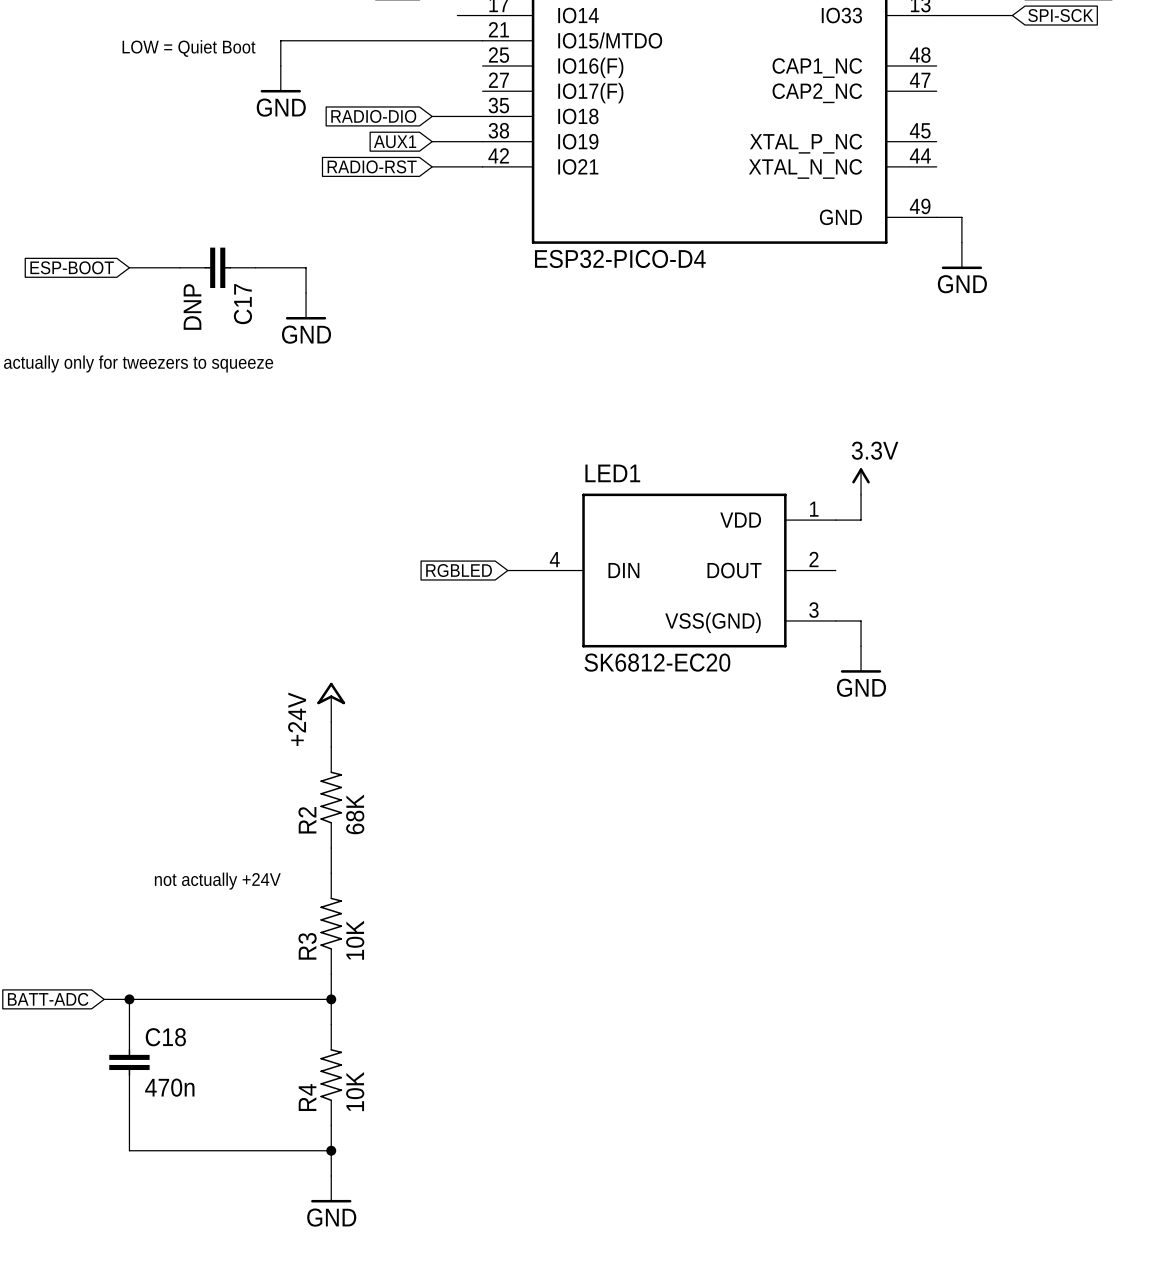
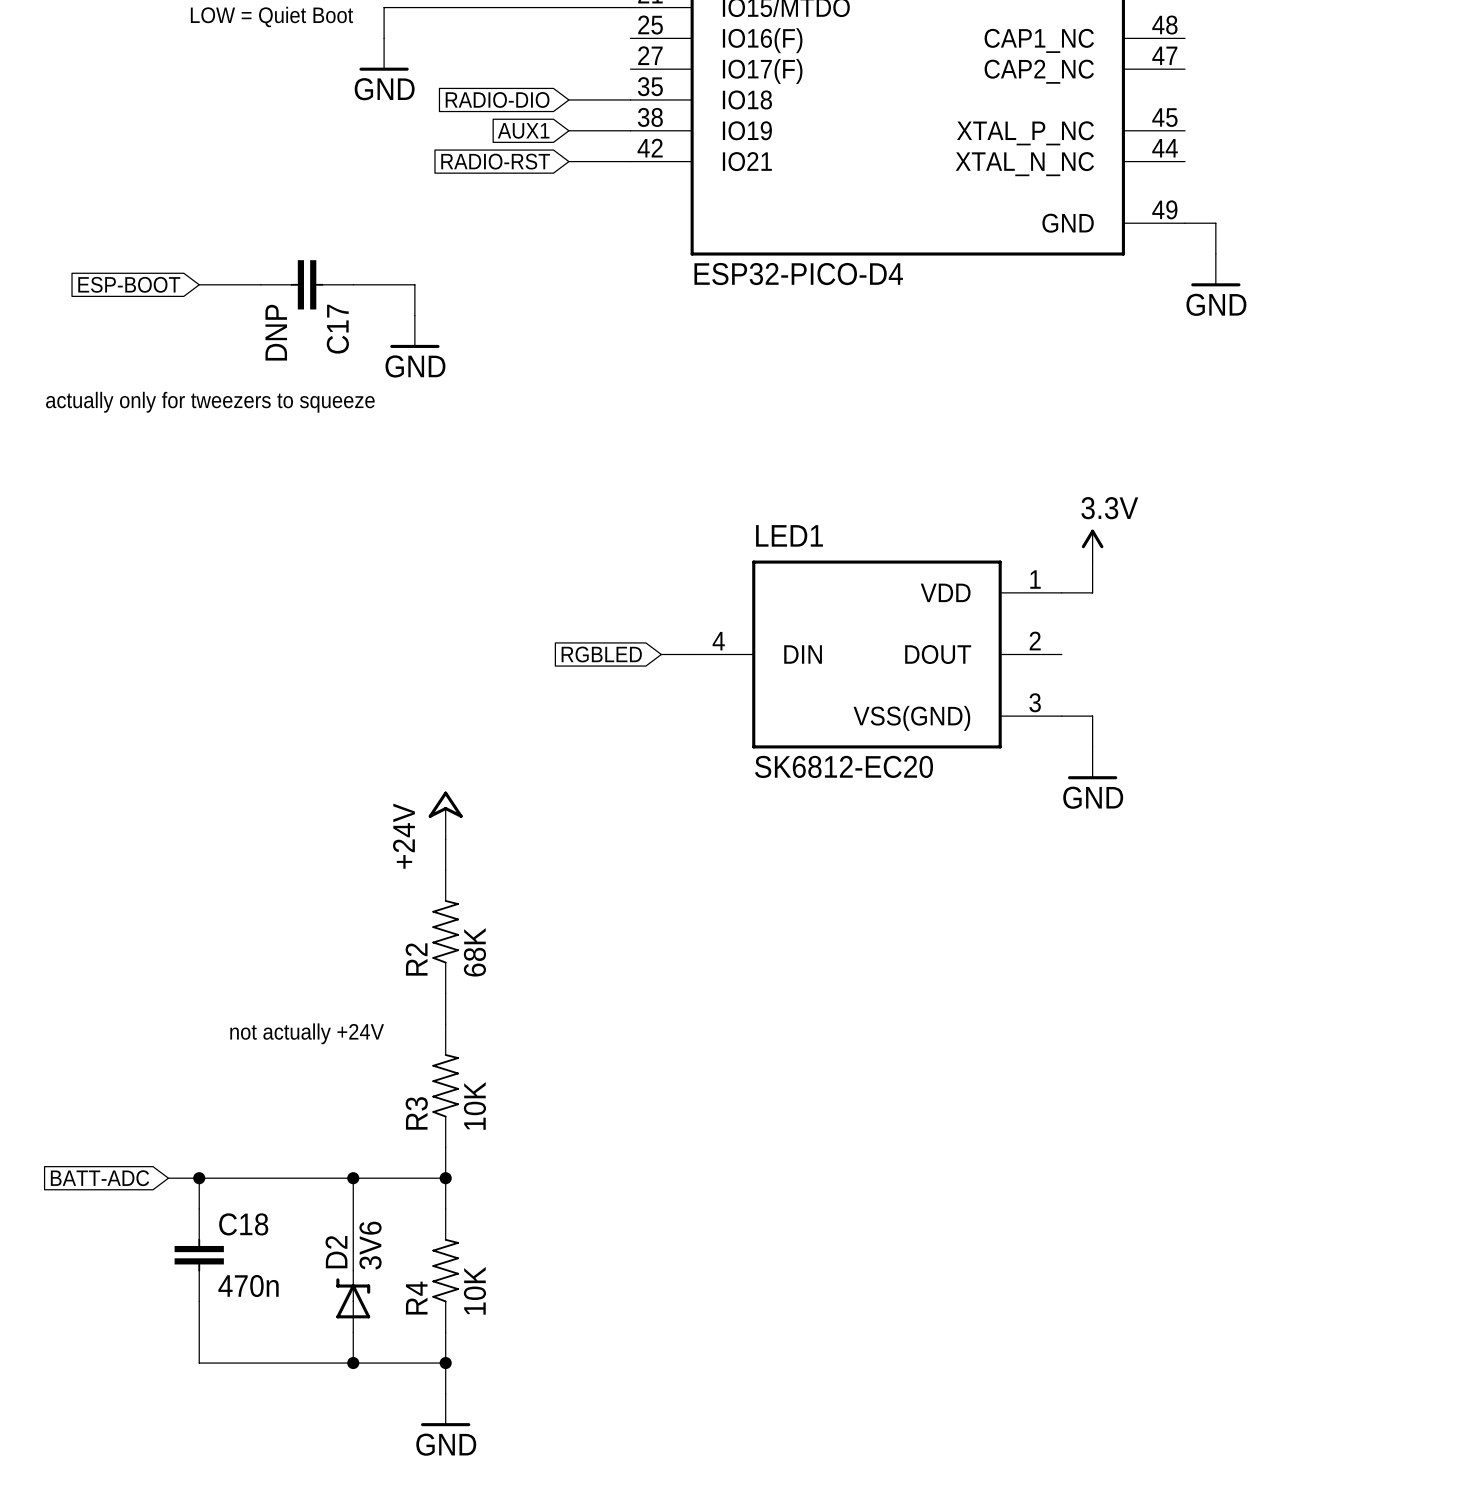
wire: none -> (353, 1178) (353, 1270)
junction: none -> (353, 1178)
D2: none -> 3V6 (353, 1301)
wire: none -> (353, 1332) (353, 1363)
junction: none -> (353, 1363)

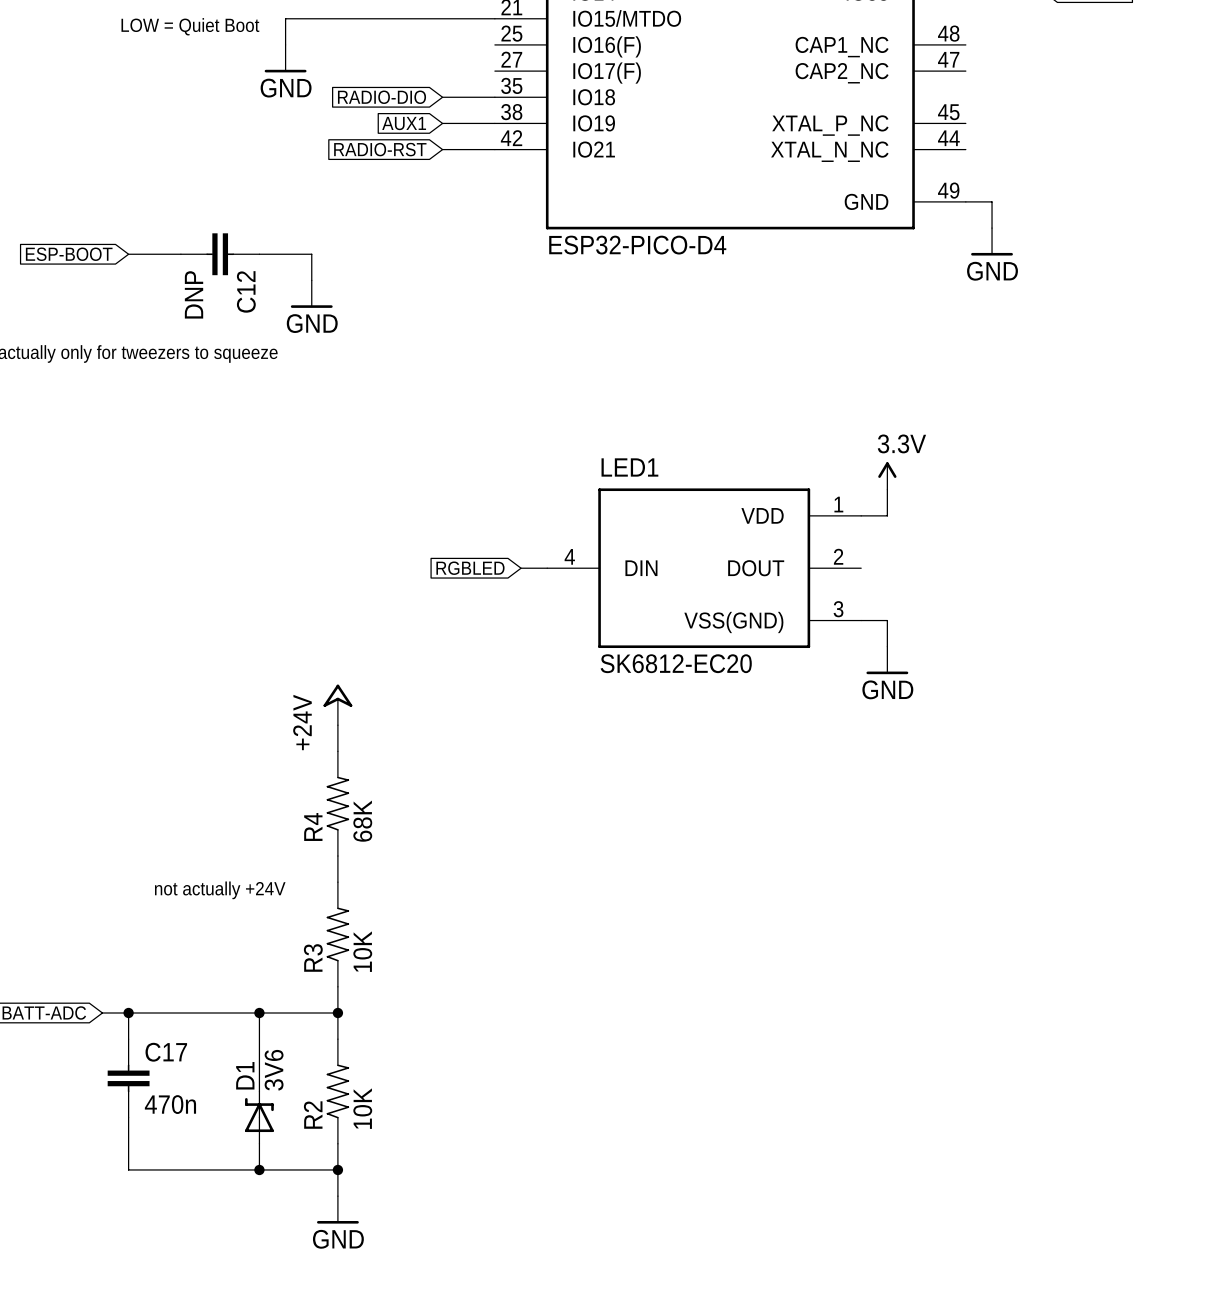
C17 name: C17 (337, 329) -> C12 (246, 291)
R2 name: R2 (416, 959) -> R4 (313, 826)
C18 name: C18 (243, 1224) -> C17 (166, 1052)
D2 name: D2 (336, 1252) -> D1 (245, 1075)
R4 name: R4 (416, 1298) -> R2 (313, 1115)

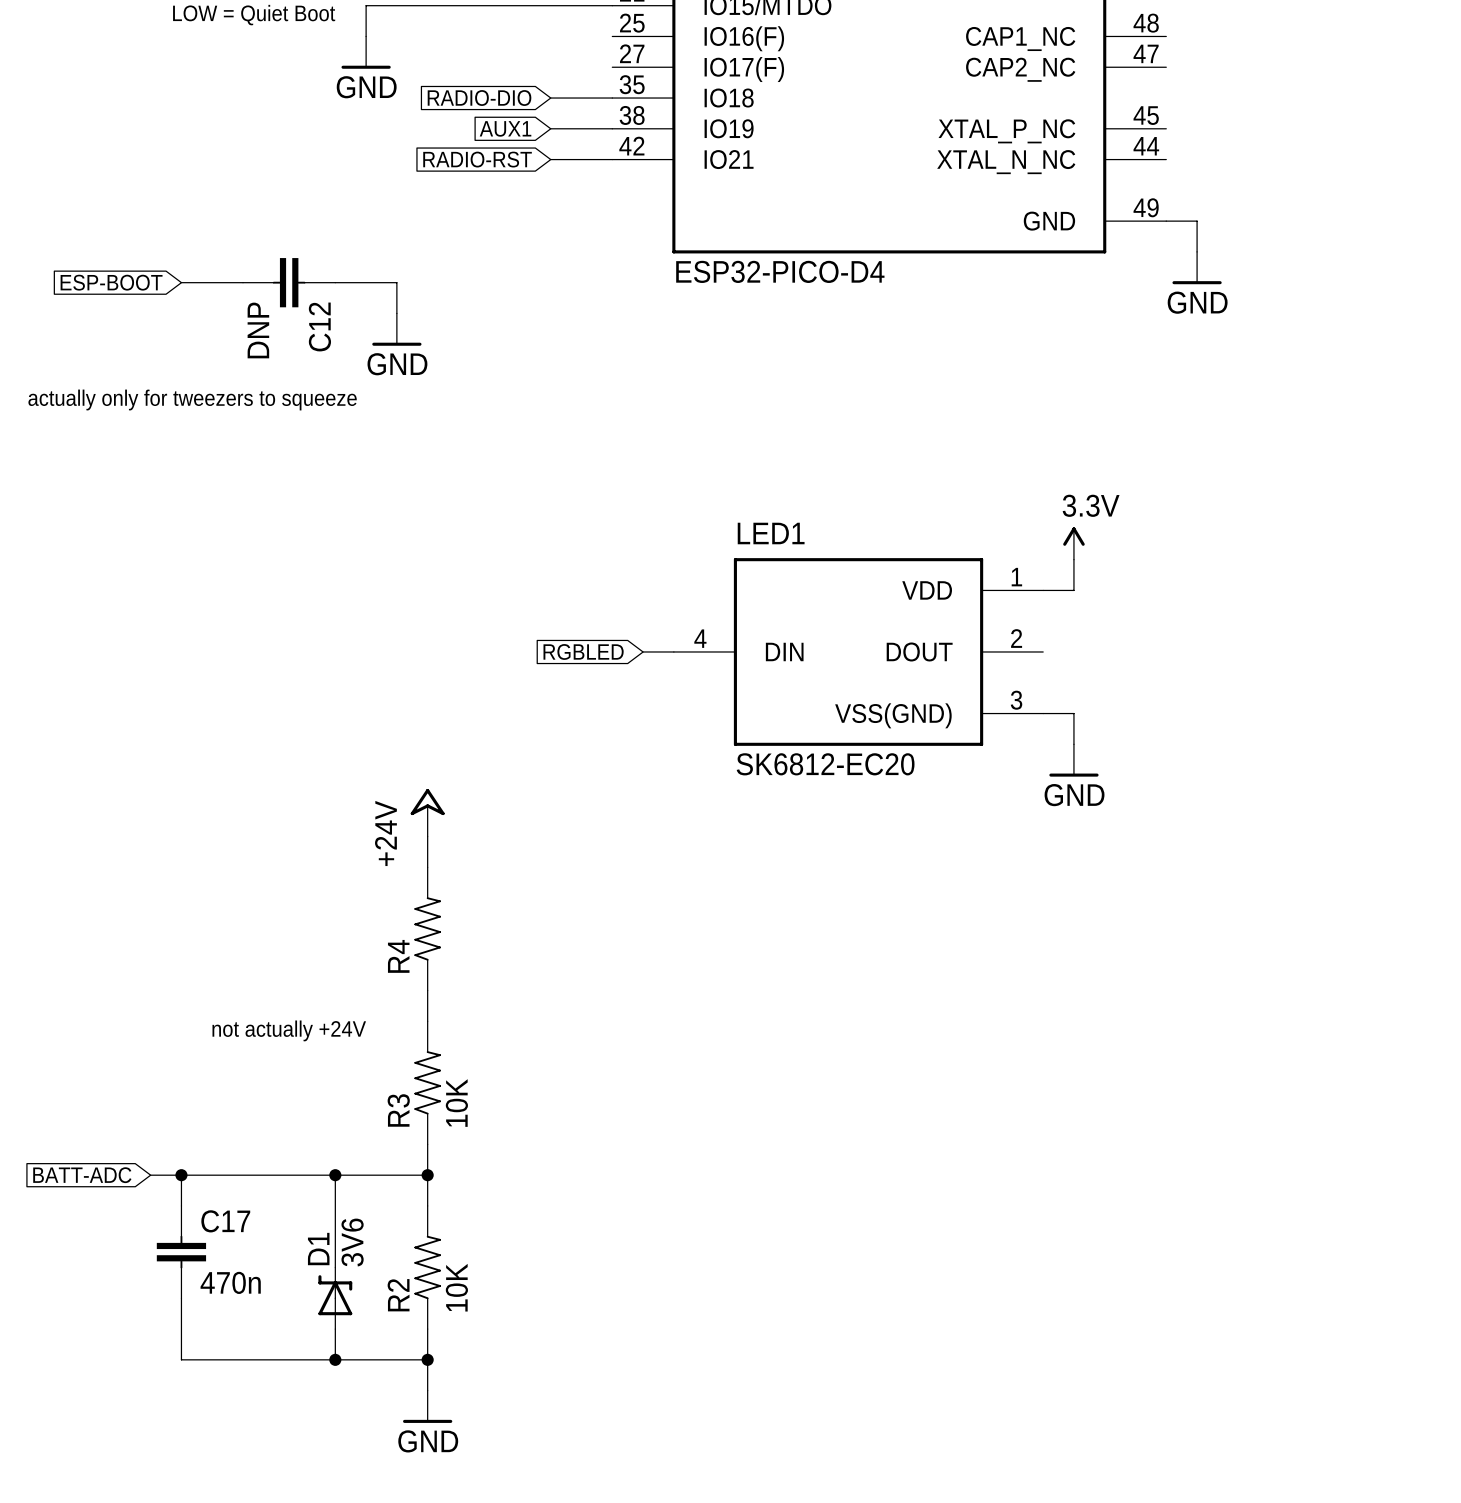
R4 value: 68K (362, 821) -> none

